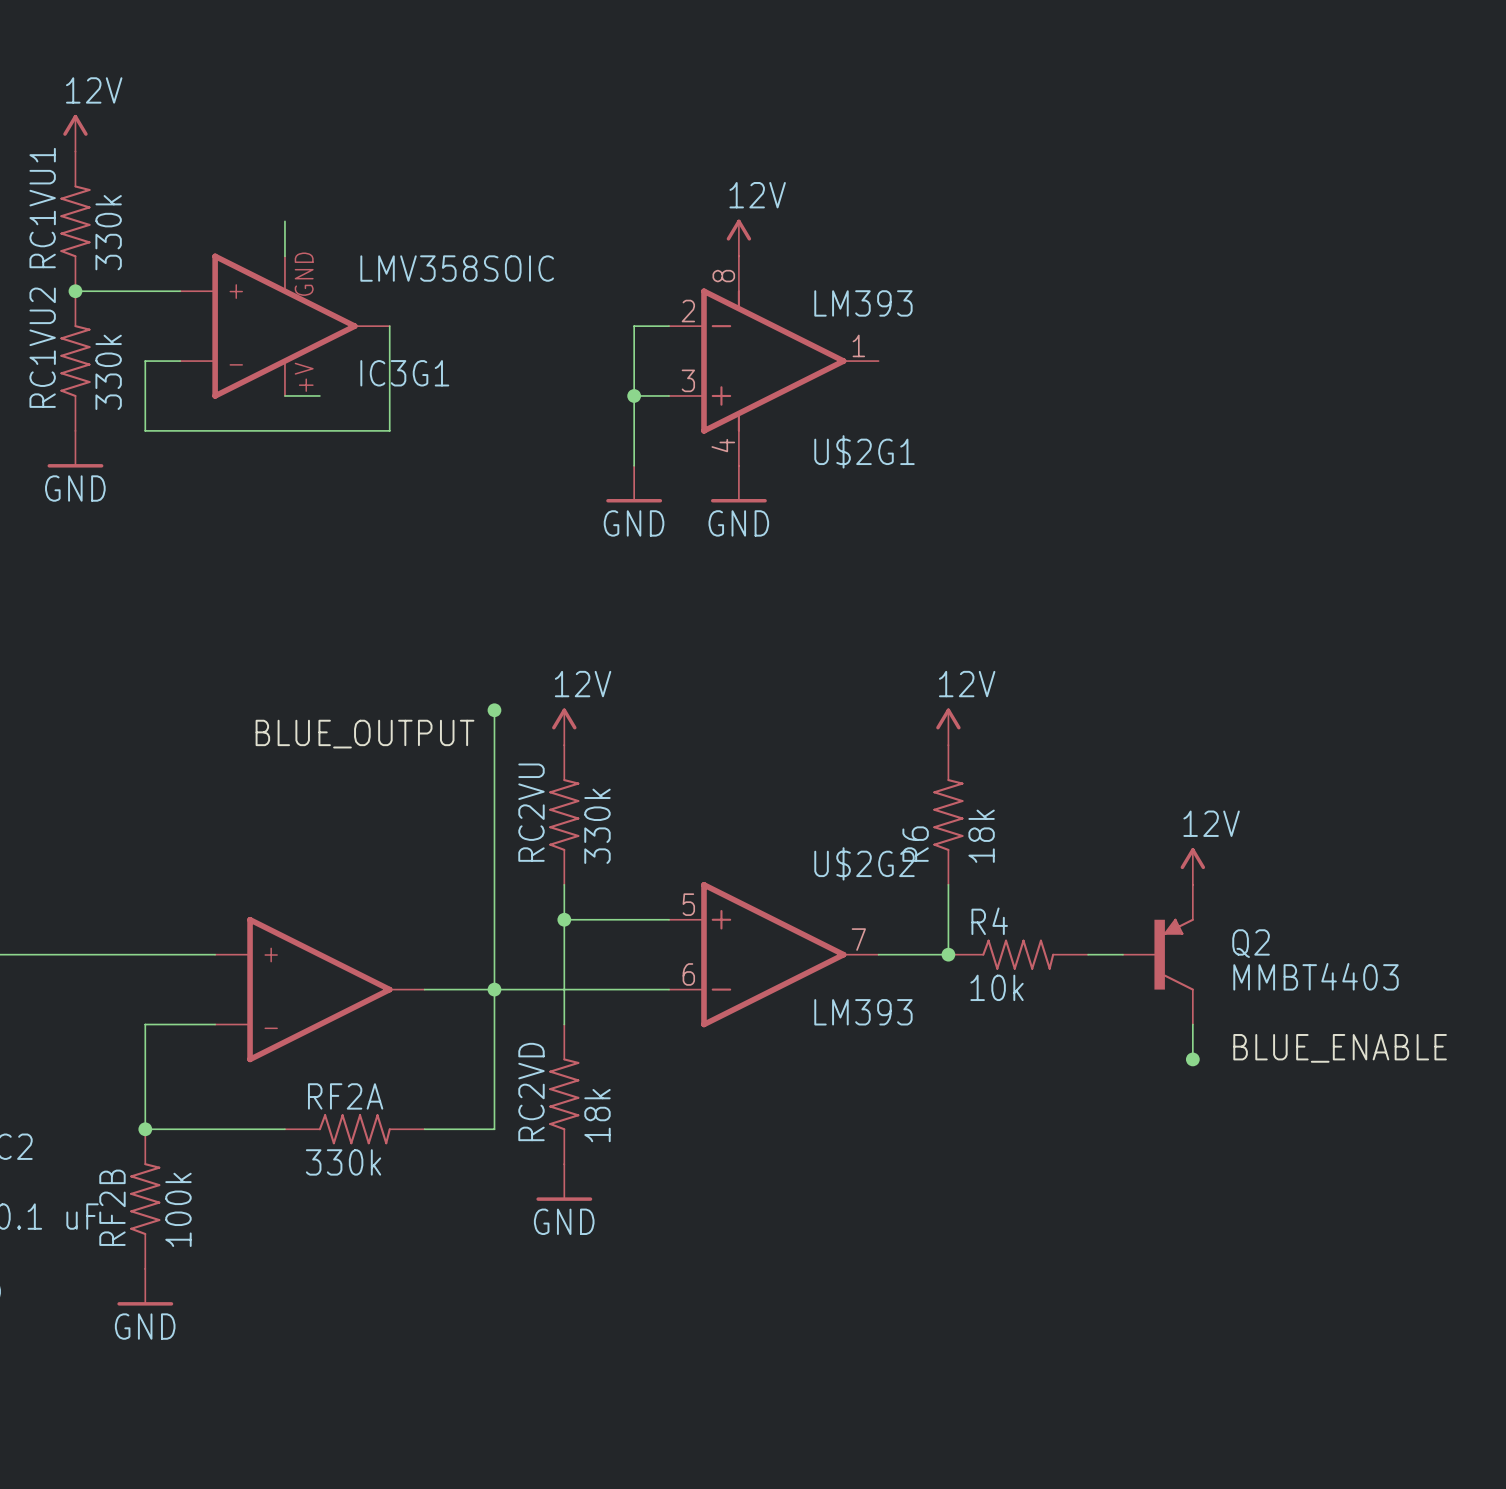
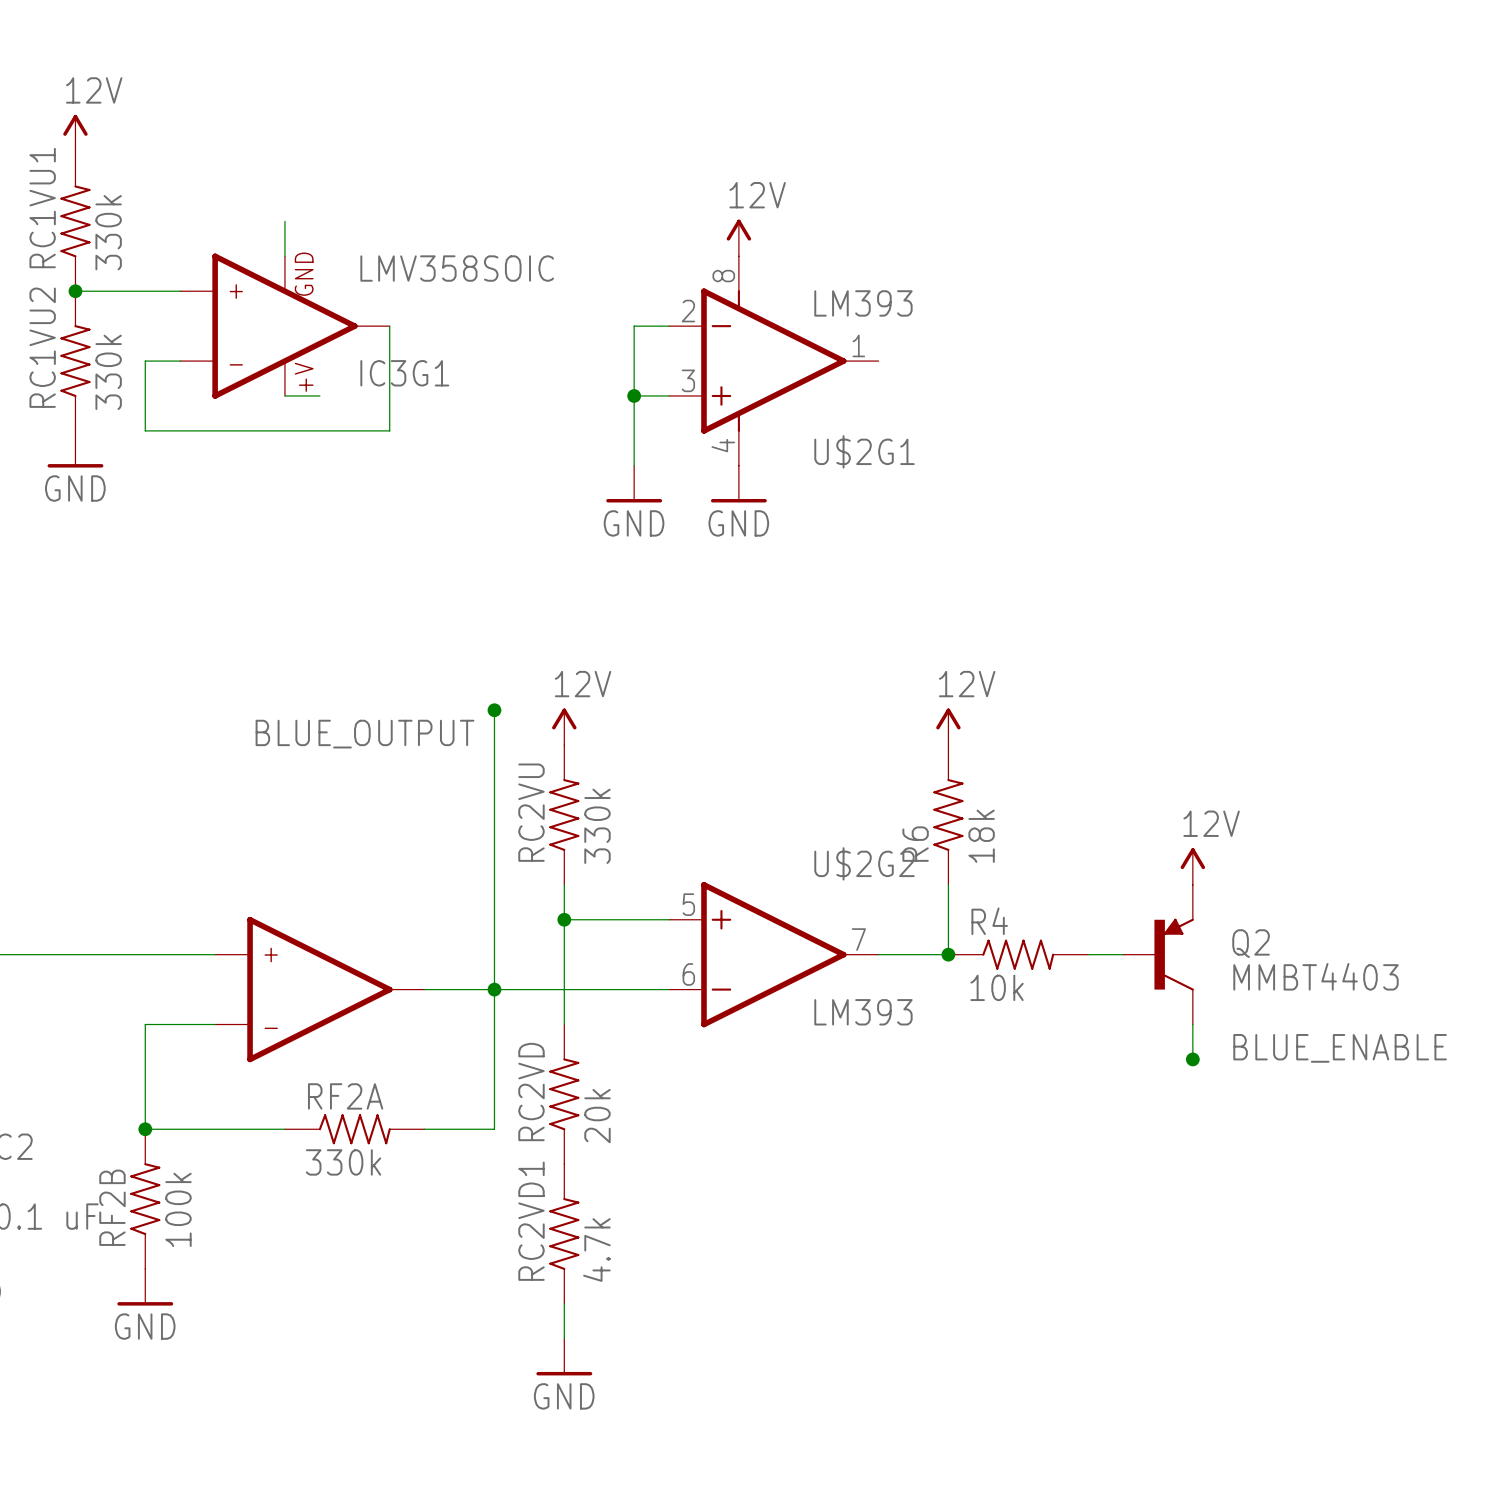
RC2VD value: 18k (597, 1115) -> 20k (597, 1116)
power symbol position: GND (564, 1182) -> GND (564, 1357)
RC2VD1: none -> 4.7k (564, 1234)
wire: none -> (564, 1303) (564, 1338)

